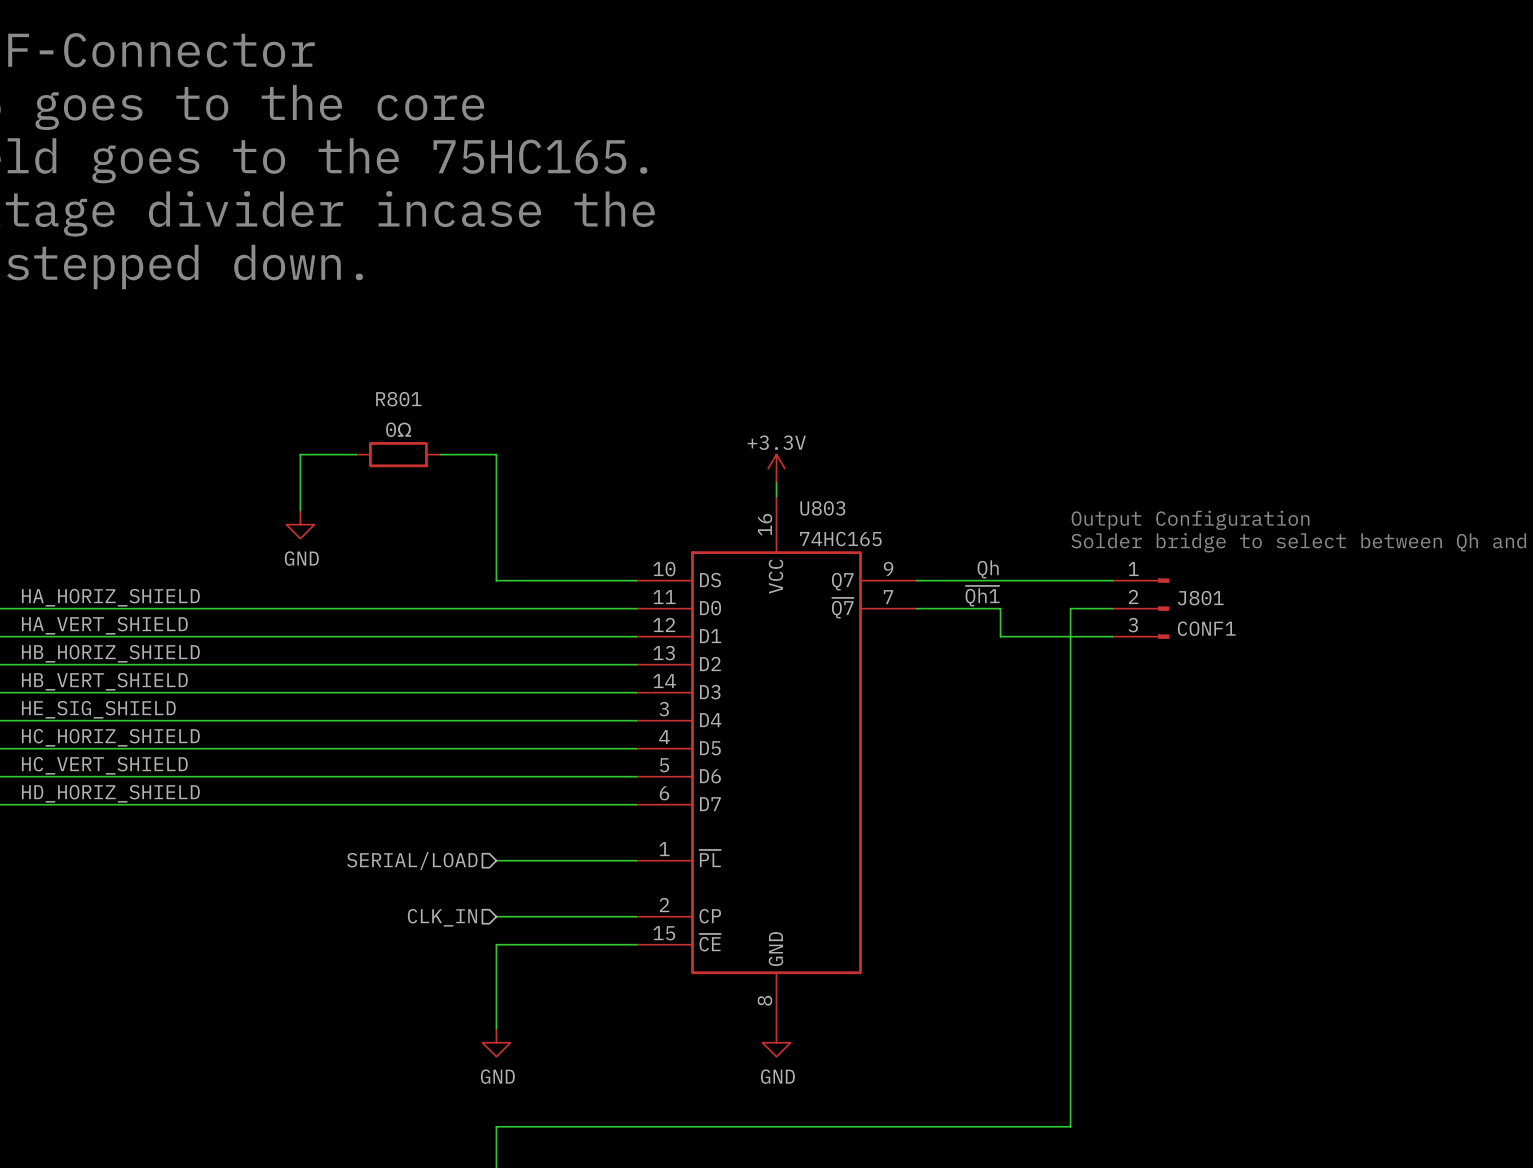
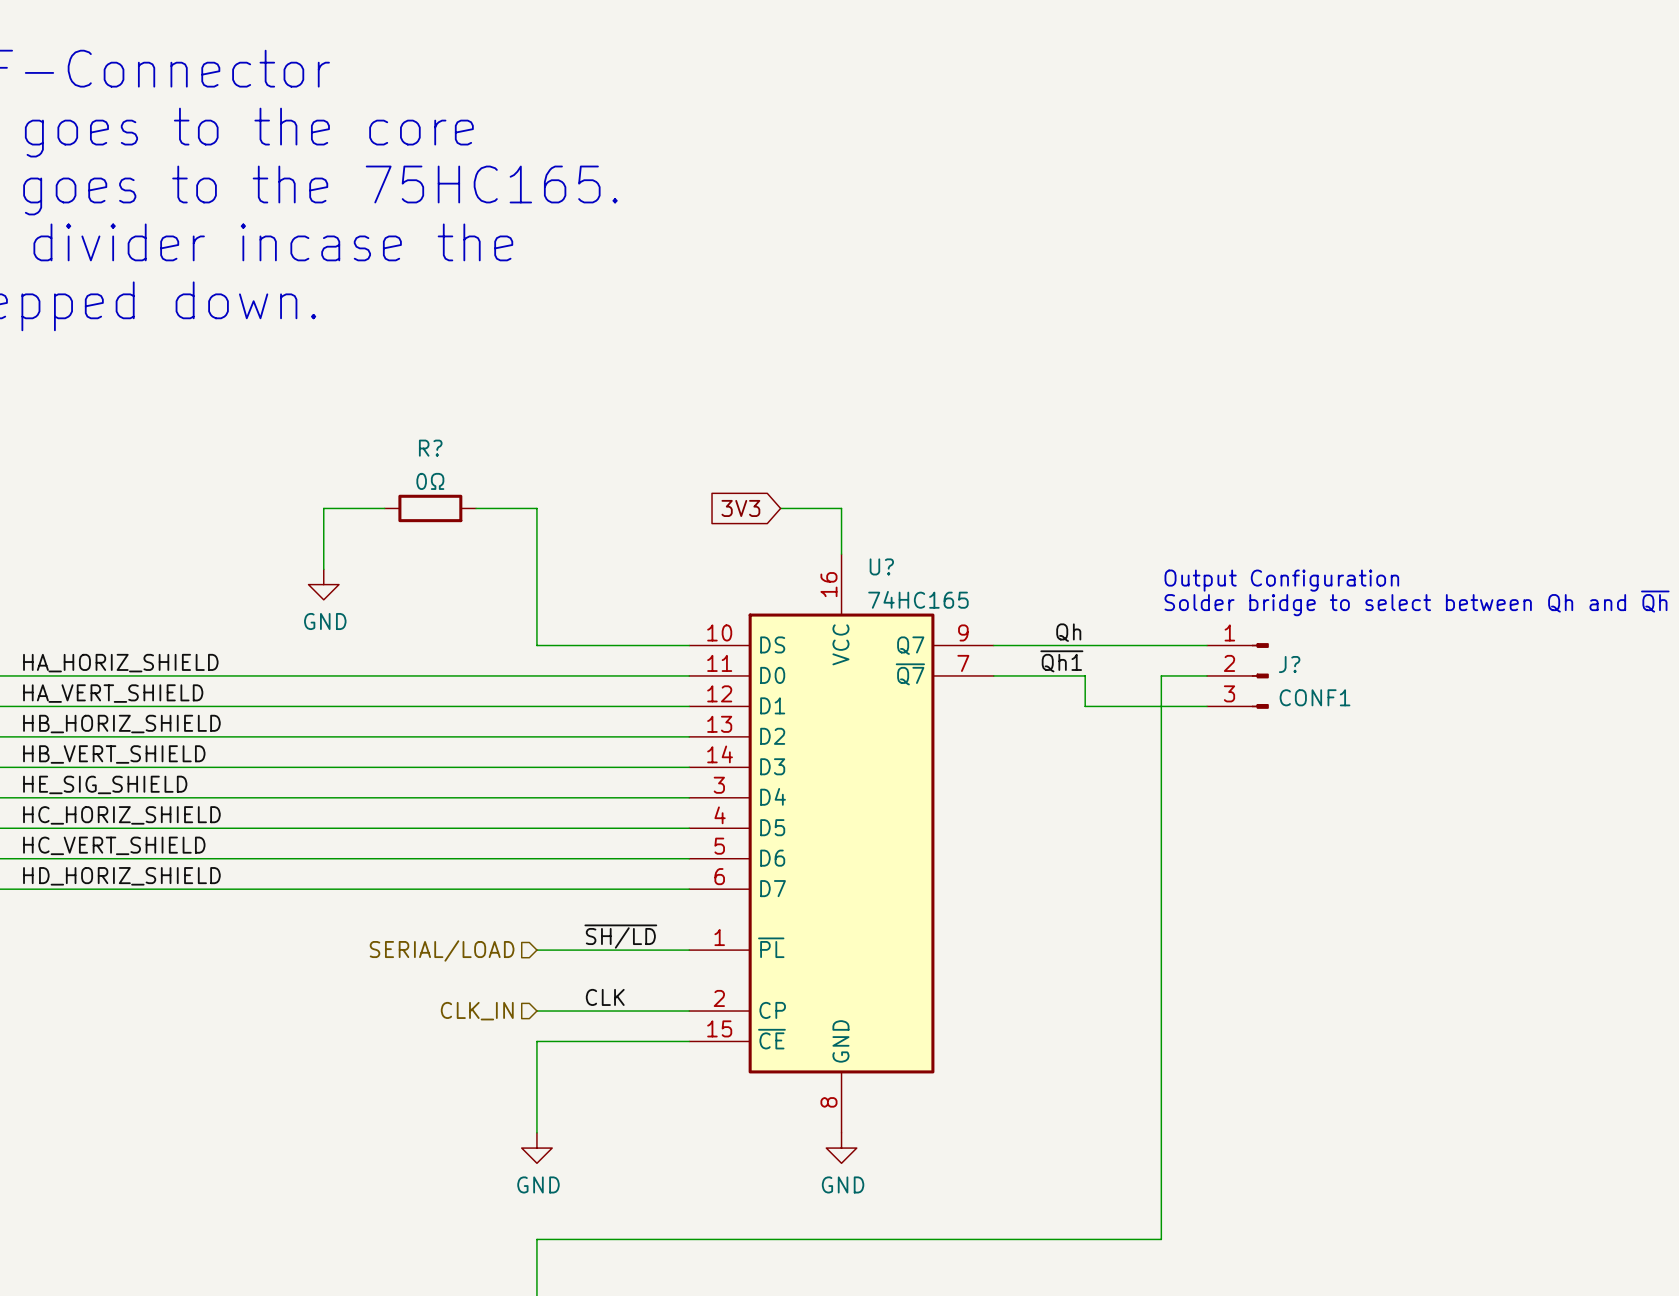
R801 name: R801 (398, 399) -> R? (430, 448)
global label: none -> 3V3 (740, 508)
wire: none -> (780, 508) (841, 508) (841, 538)
power symbol: +3.3V (776, 468) -> none
U803 name: U803 (822, 508) -> U? (881, 566)
J801 name: J801 (1200, 598) -> J? (1289, 664)
label: none -> ~{SH/LD} (620, 936)
label: none -> CLK (605, 997)

